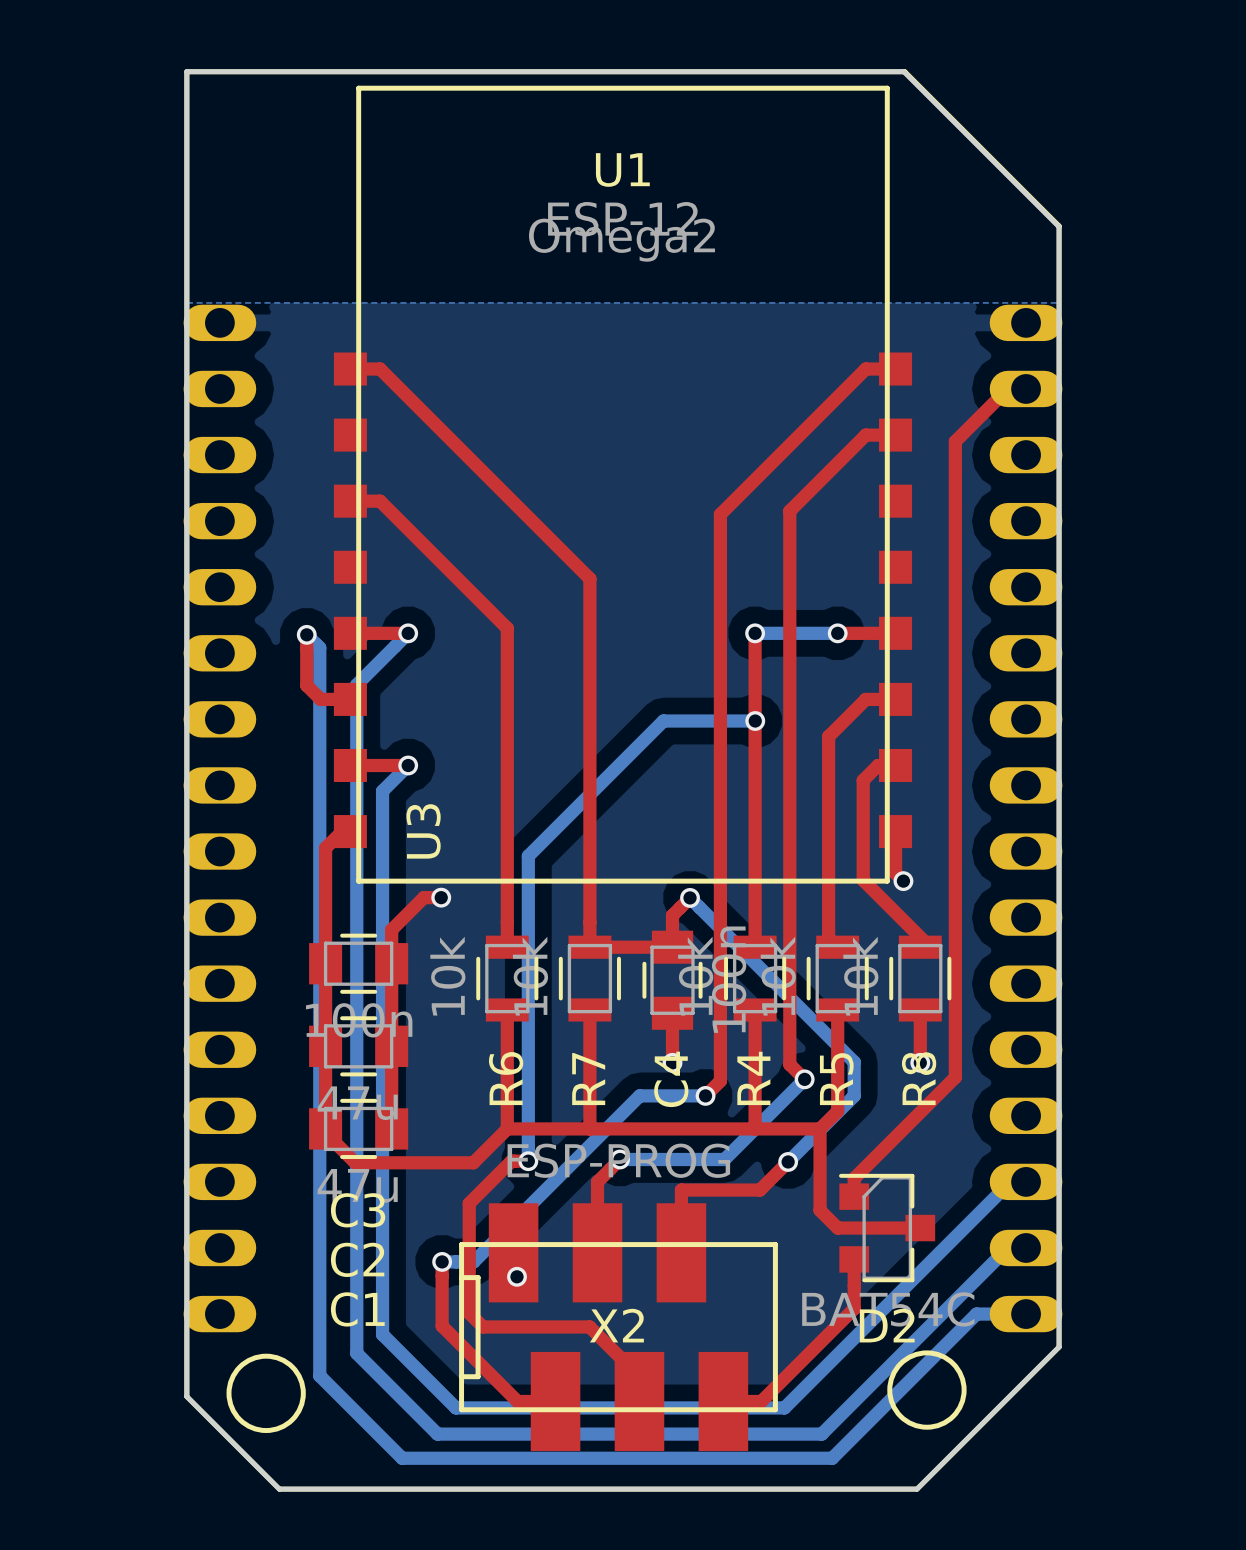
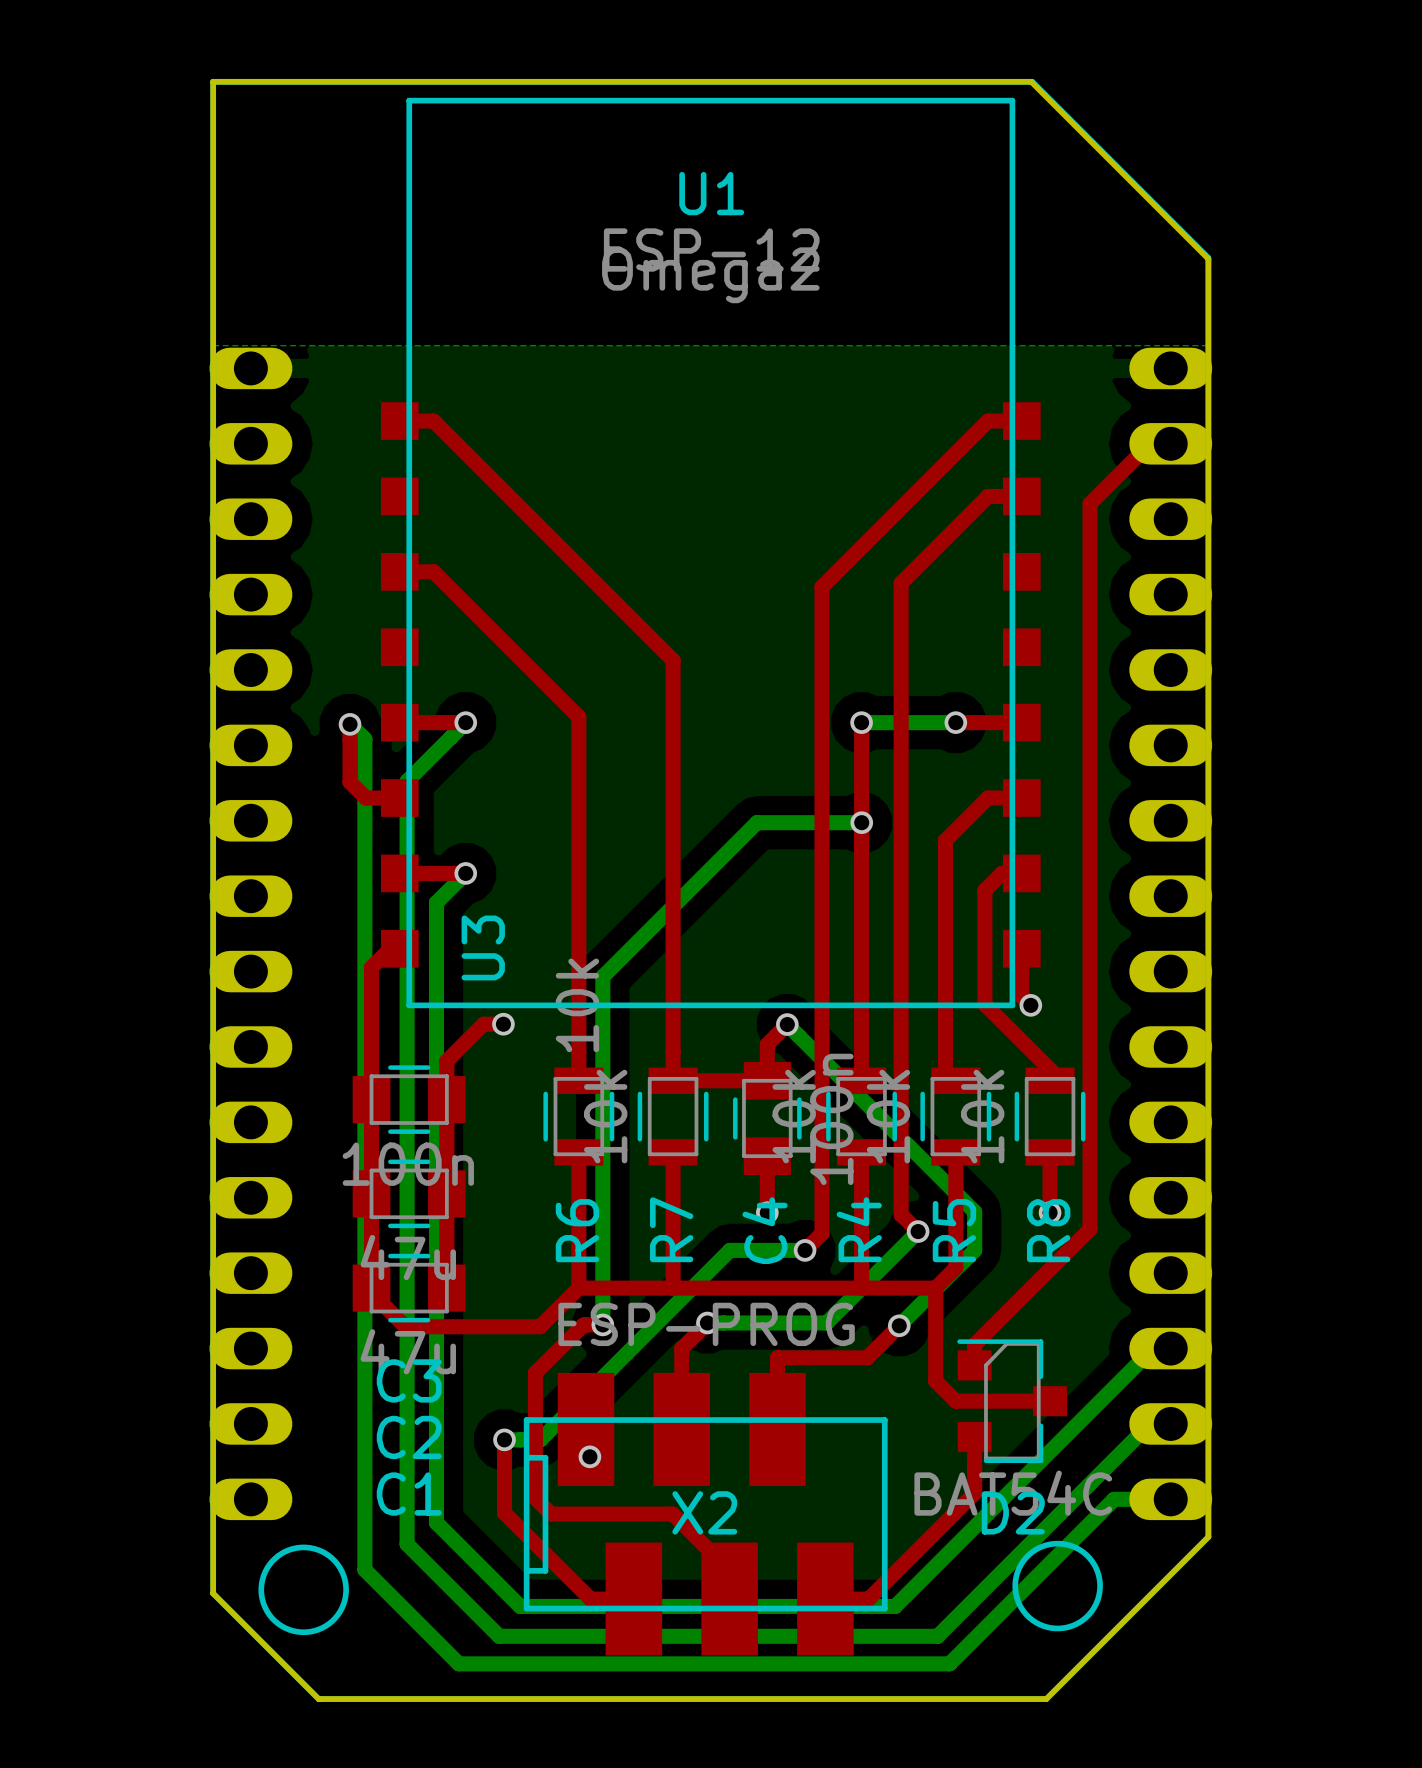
R6 value position: 10k (447, 976) -> 10k (577, 1005)

